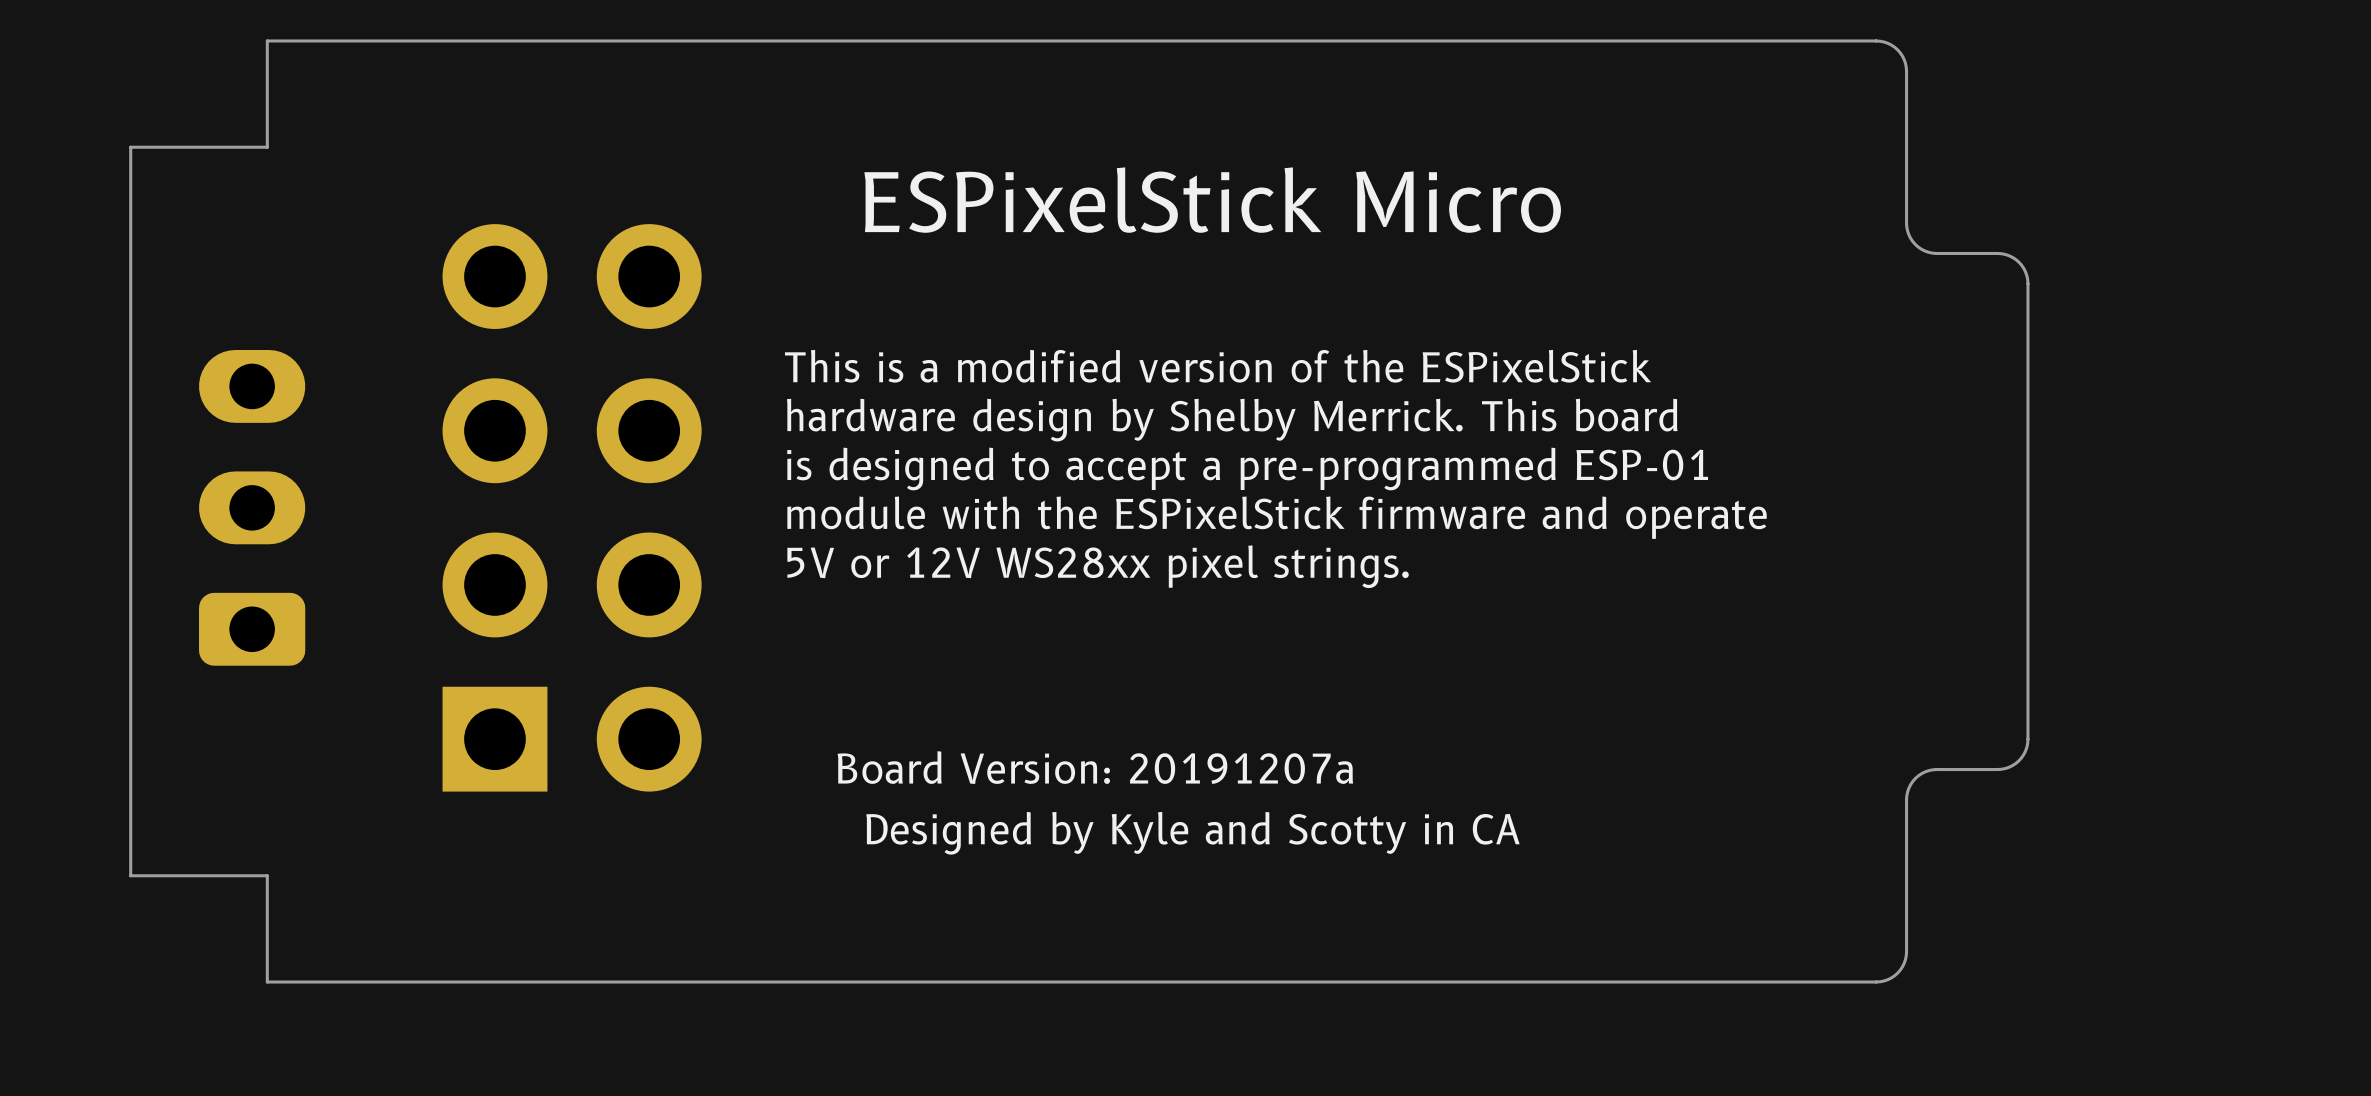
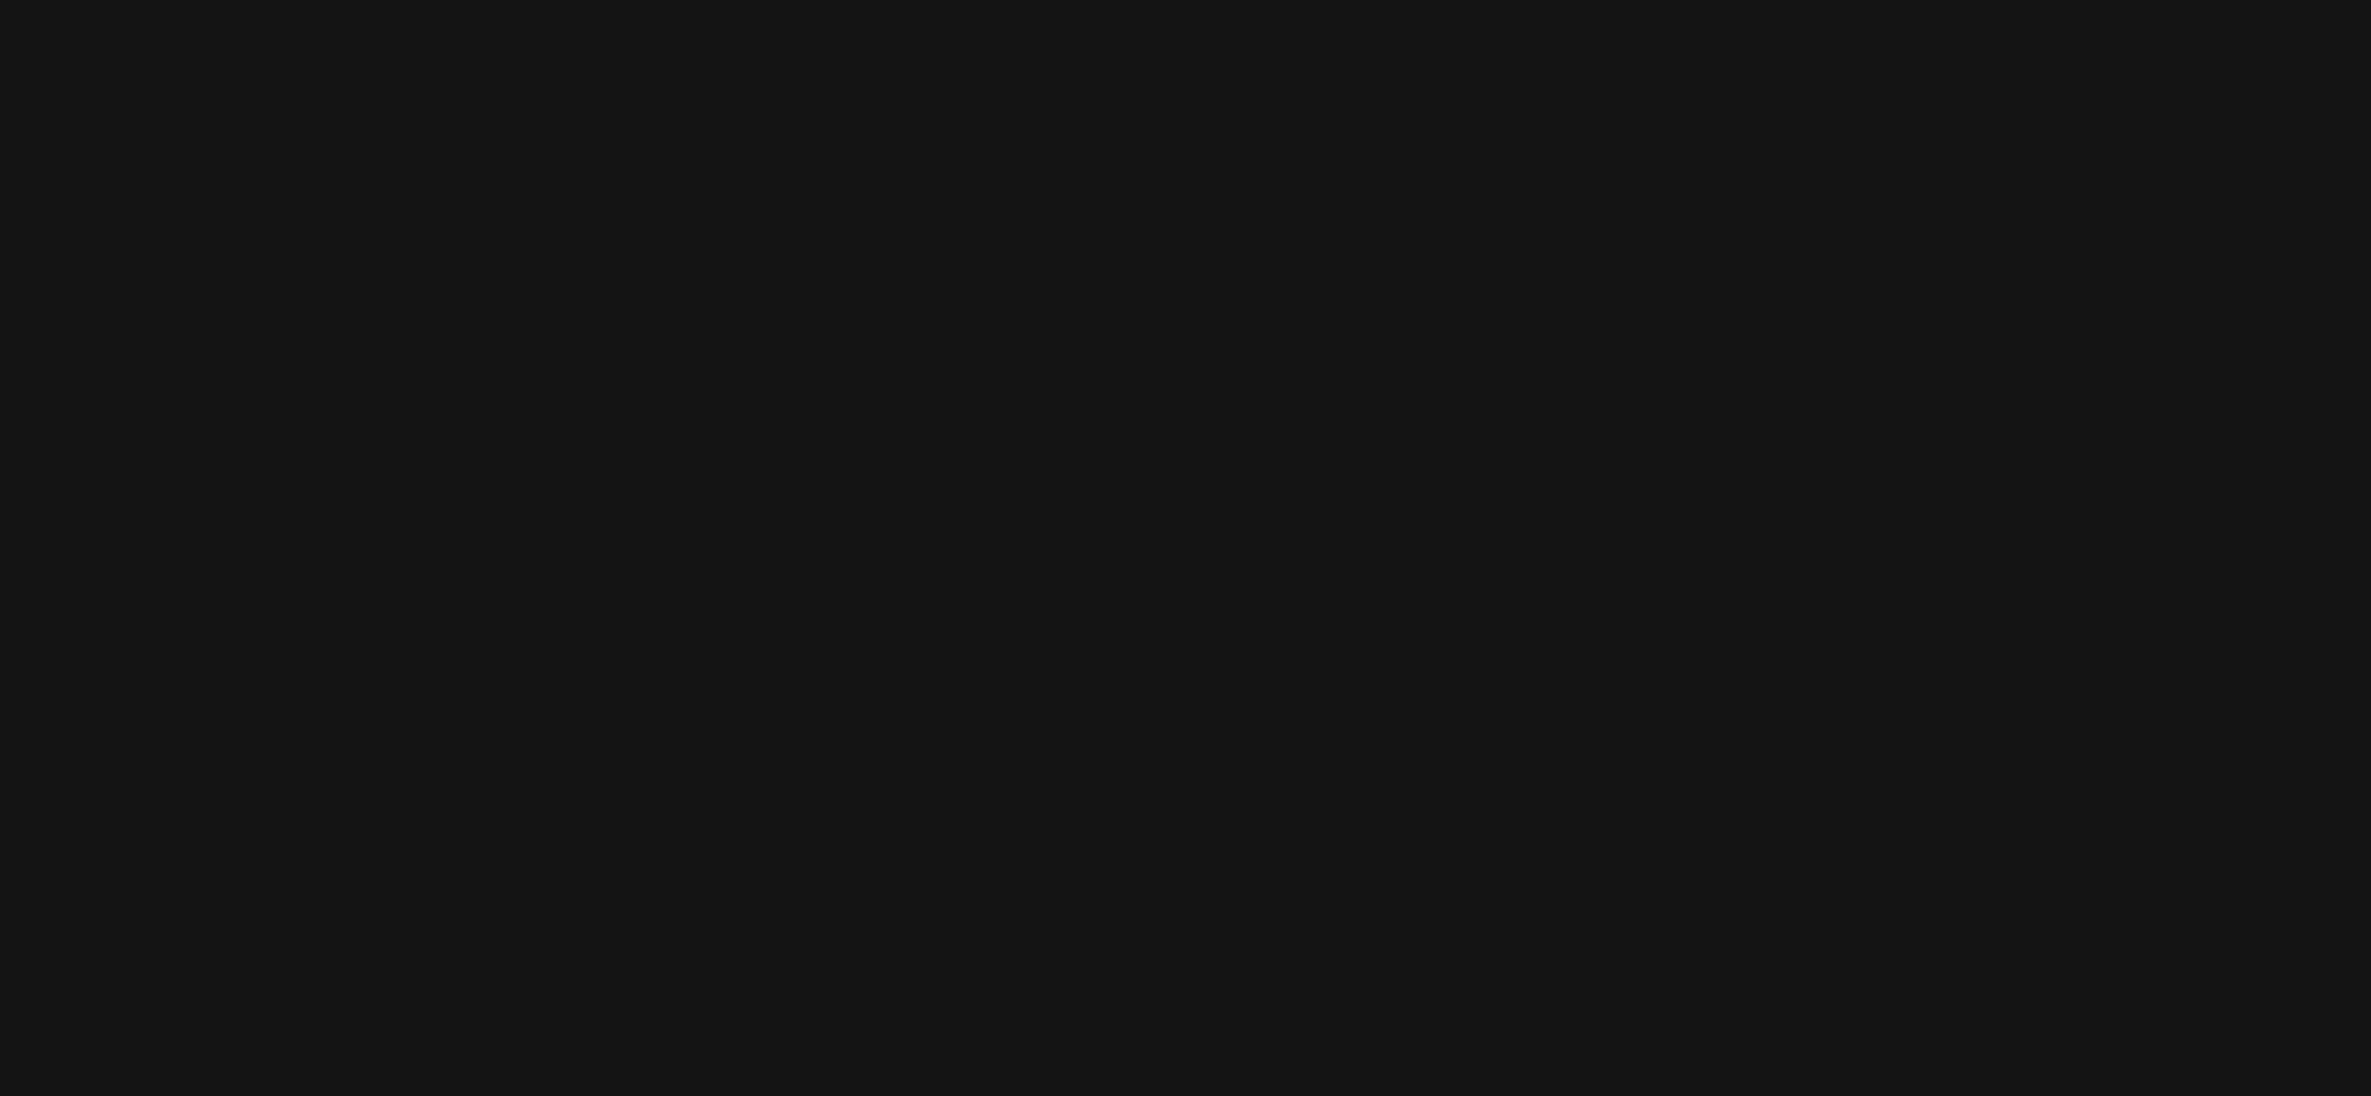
board edge: (1876, 40) (267, 40) (267, 147) (130, 147) (130, 875) (267, 875) (267, 982) (1876, 982) (1887, 979) (1900, 970) (1906, 955) (1906, 799) (1910, 784) (1918, 775) (1932, 769) (2005, 768) (2019, 760) (2026, 747) (2027, 283) (2026, 275) (2021, 265) (2009, 255) (1997, 253) (1932, 253) (1918, 247) (1910, 238) (1906, 223) (1906, 67) (1902, 56) (1894, 47) (1884, 42) (1876, 40) -> none
text: ESPixelStick Micro (1212, 200) -> none
text: This is a modified version of the ESPixelStick (1218, 366) -> none
text: hardware design by Shelby Merrick. This board (1232, 420) -> none
text: is designed to accept a pre-programmed ESP-01 (1247, 468) -> none
part: (252, 507) -> none
part: (572, 507) -> none
text: module with the ESPixelStick firmware and operate (1277, 517) -> none
text: 5V or 12V WS28xx pixel strings. (1098, 566) -> none
text: Board Version: 20191207a (1095, 767) -> none
text: Designed by Kyle and Scotty in CA (1192, 833) -> none

